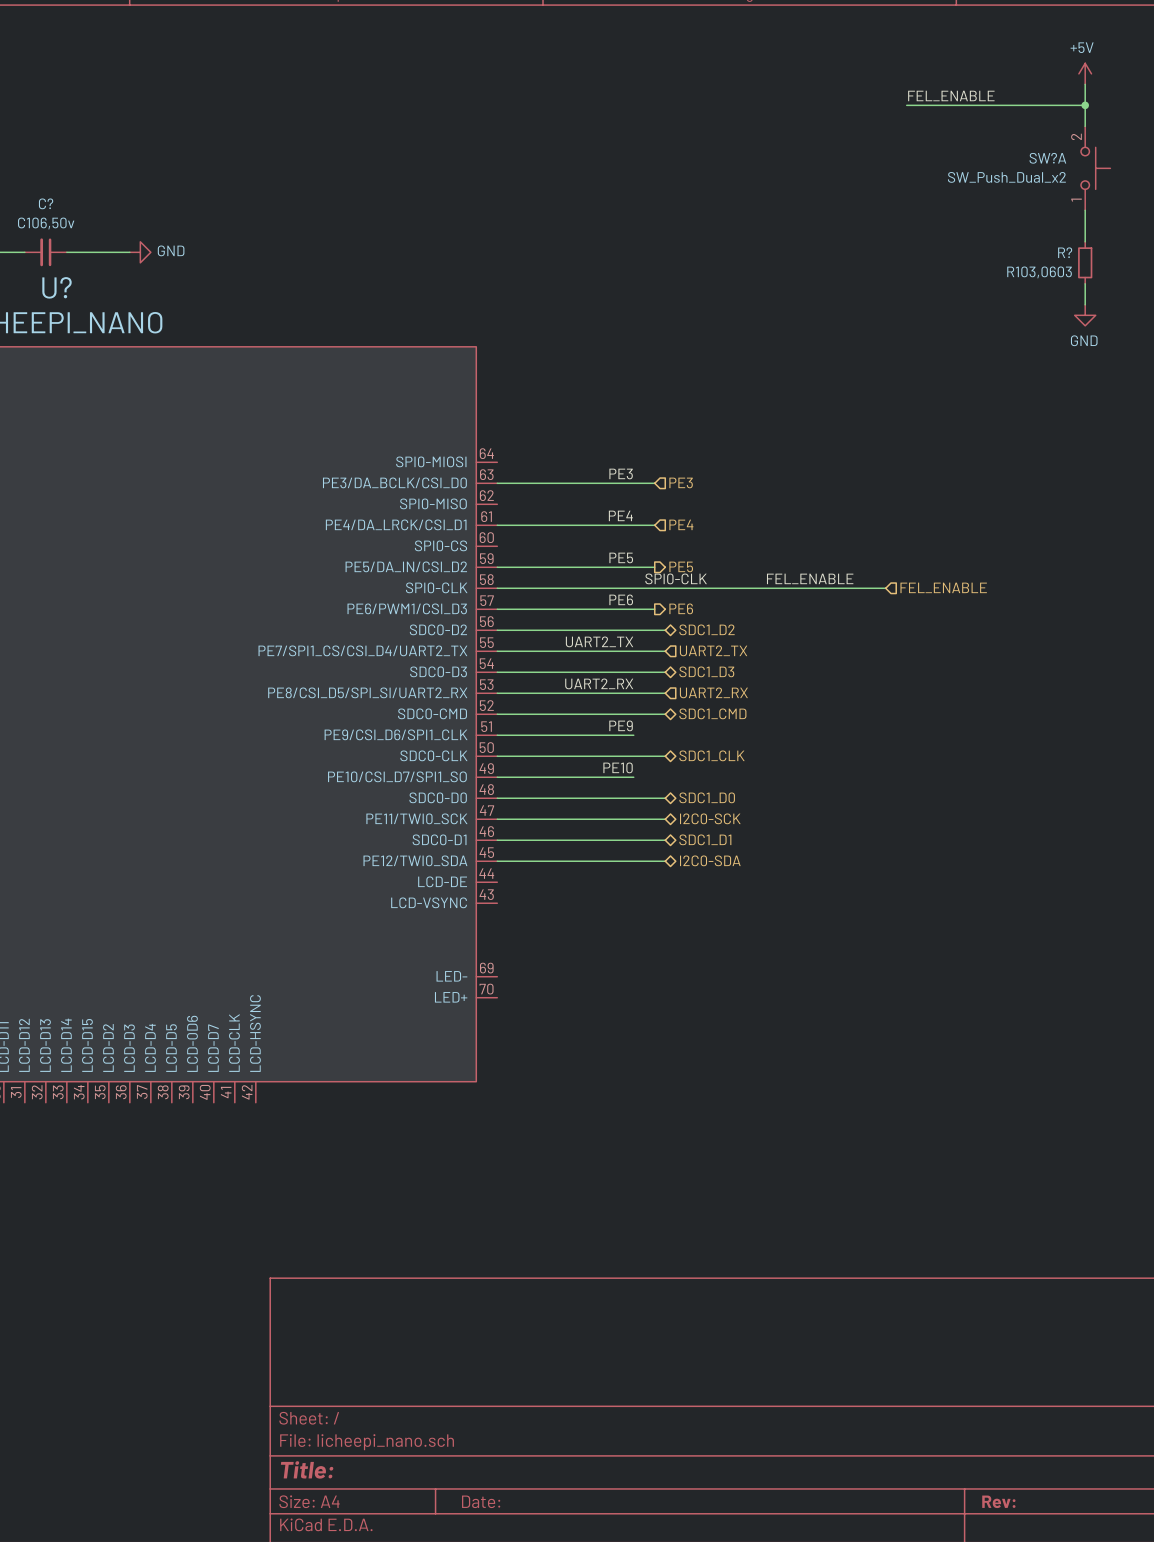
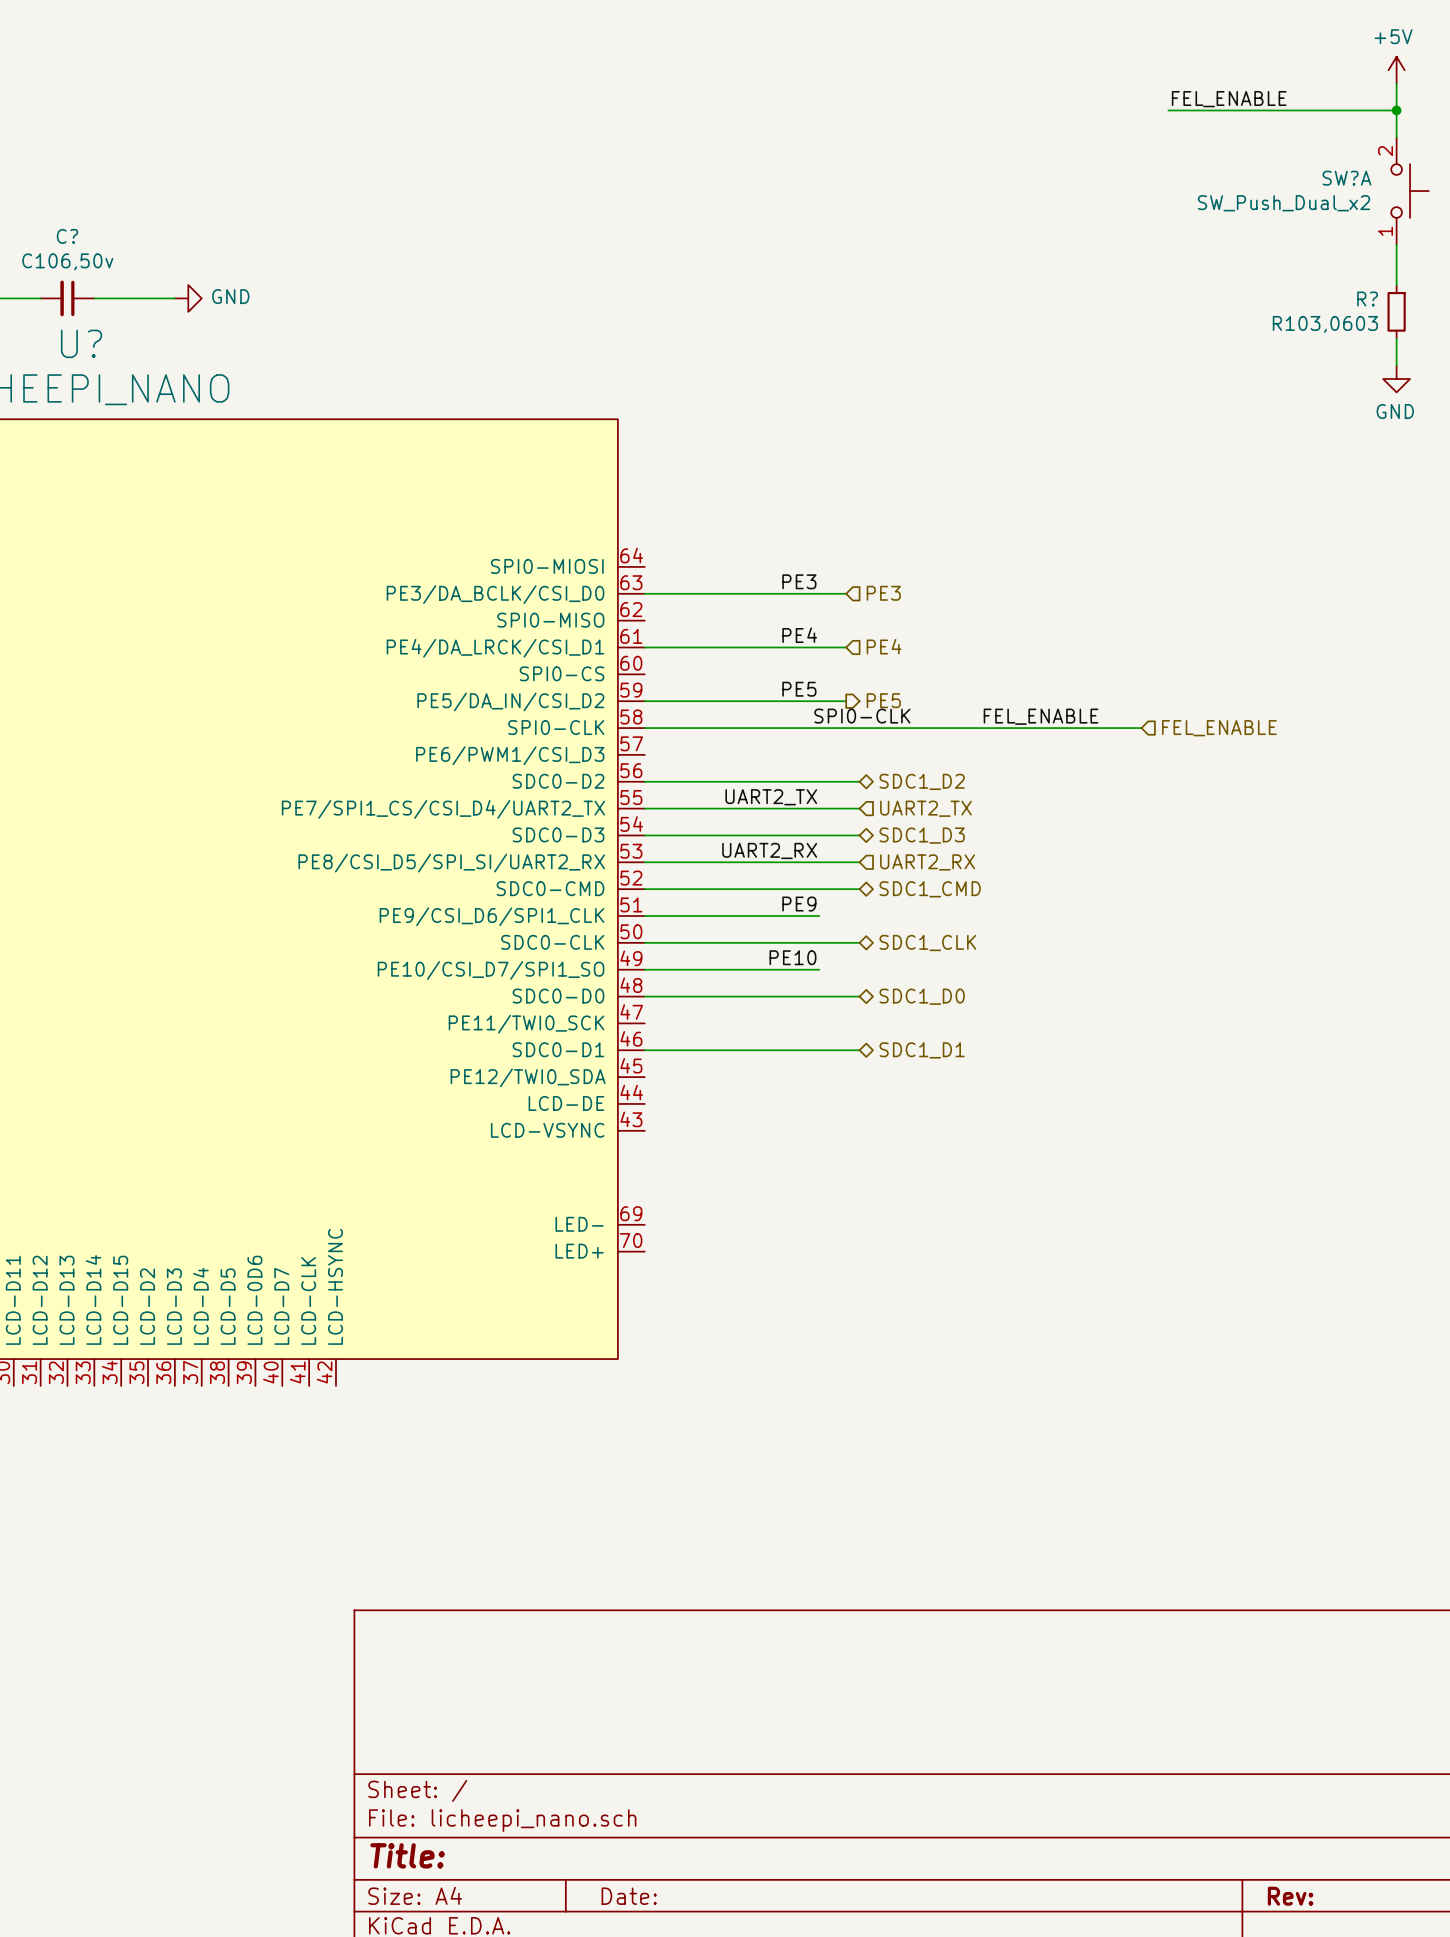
label: PE6 (621, 599) -> none
hierarchical label: PE6 (681, 608) -> none
wire: (497, 609) (654, 609) -> none
hierarchical label: I2C0-SCK (710, 818) -> none
wire: (497, 819) (665, 819) -> none
hierarchical label: I2C0-SDA (710, 860) -> none
wire: (497, 861) (665, 861) -> none

